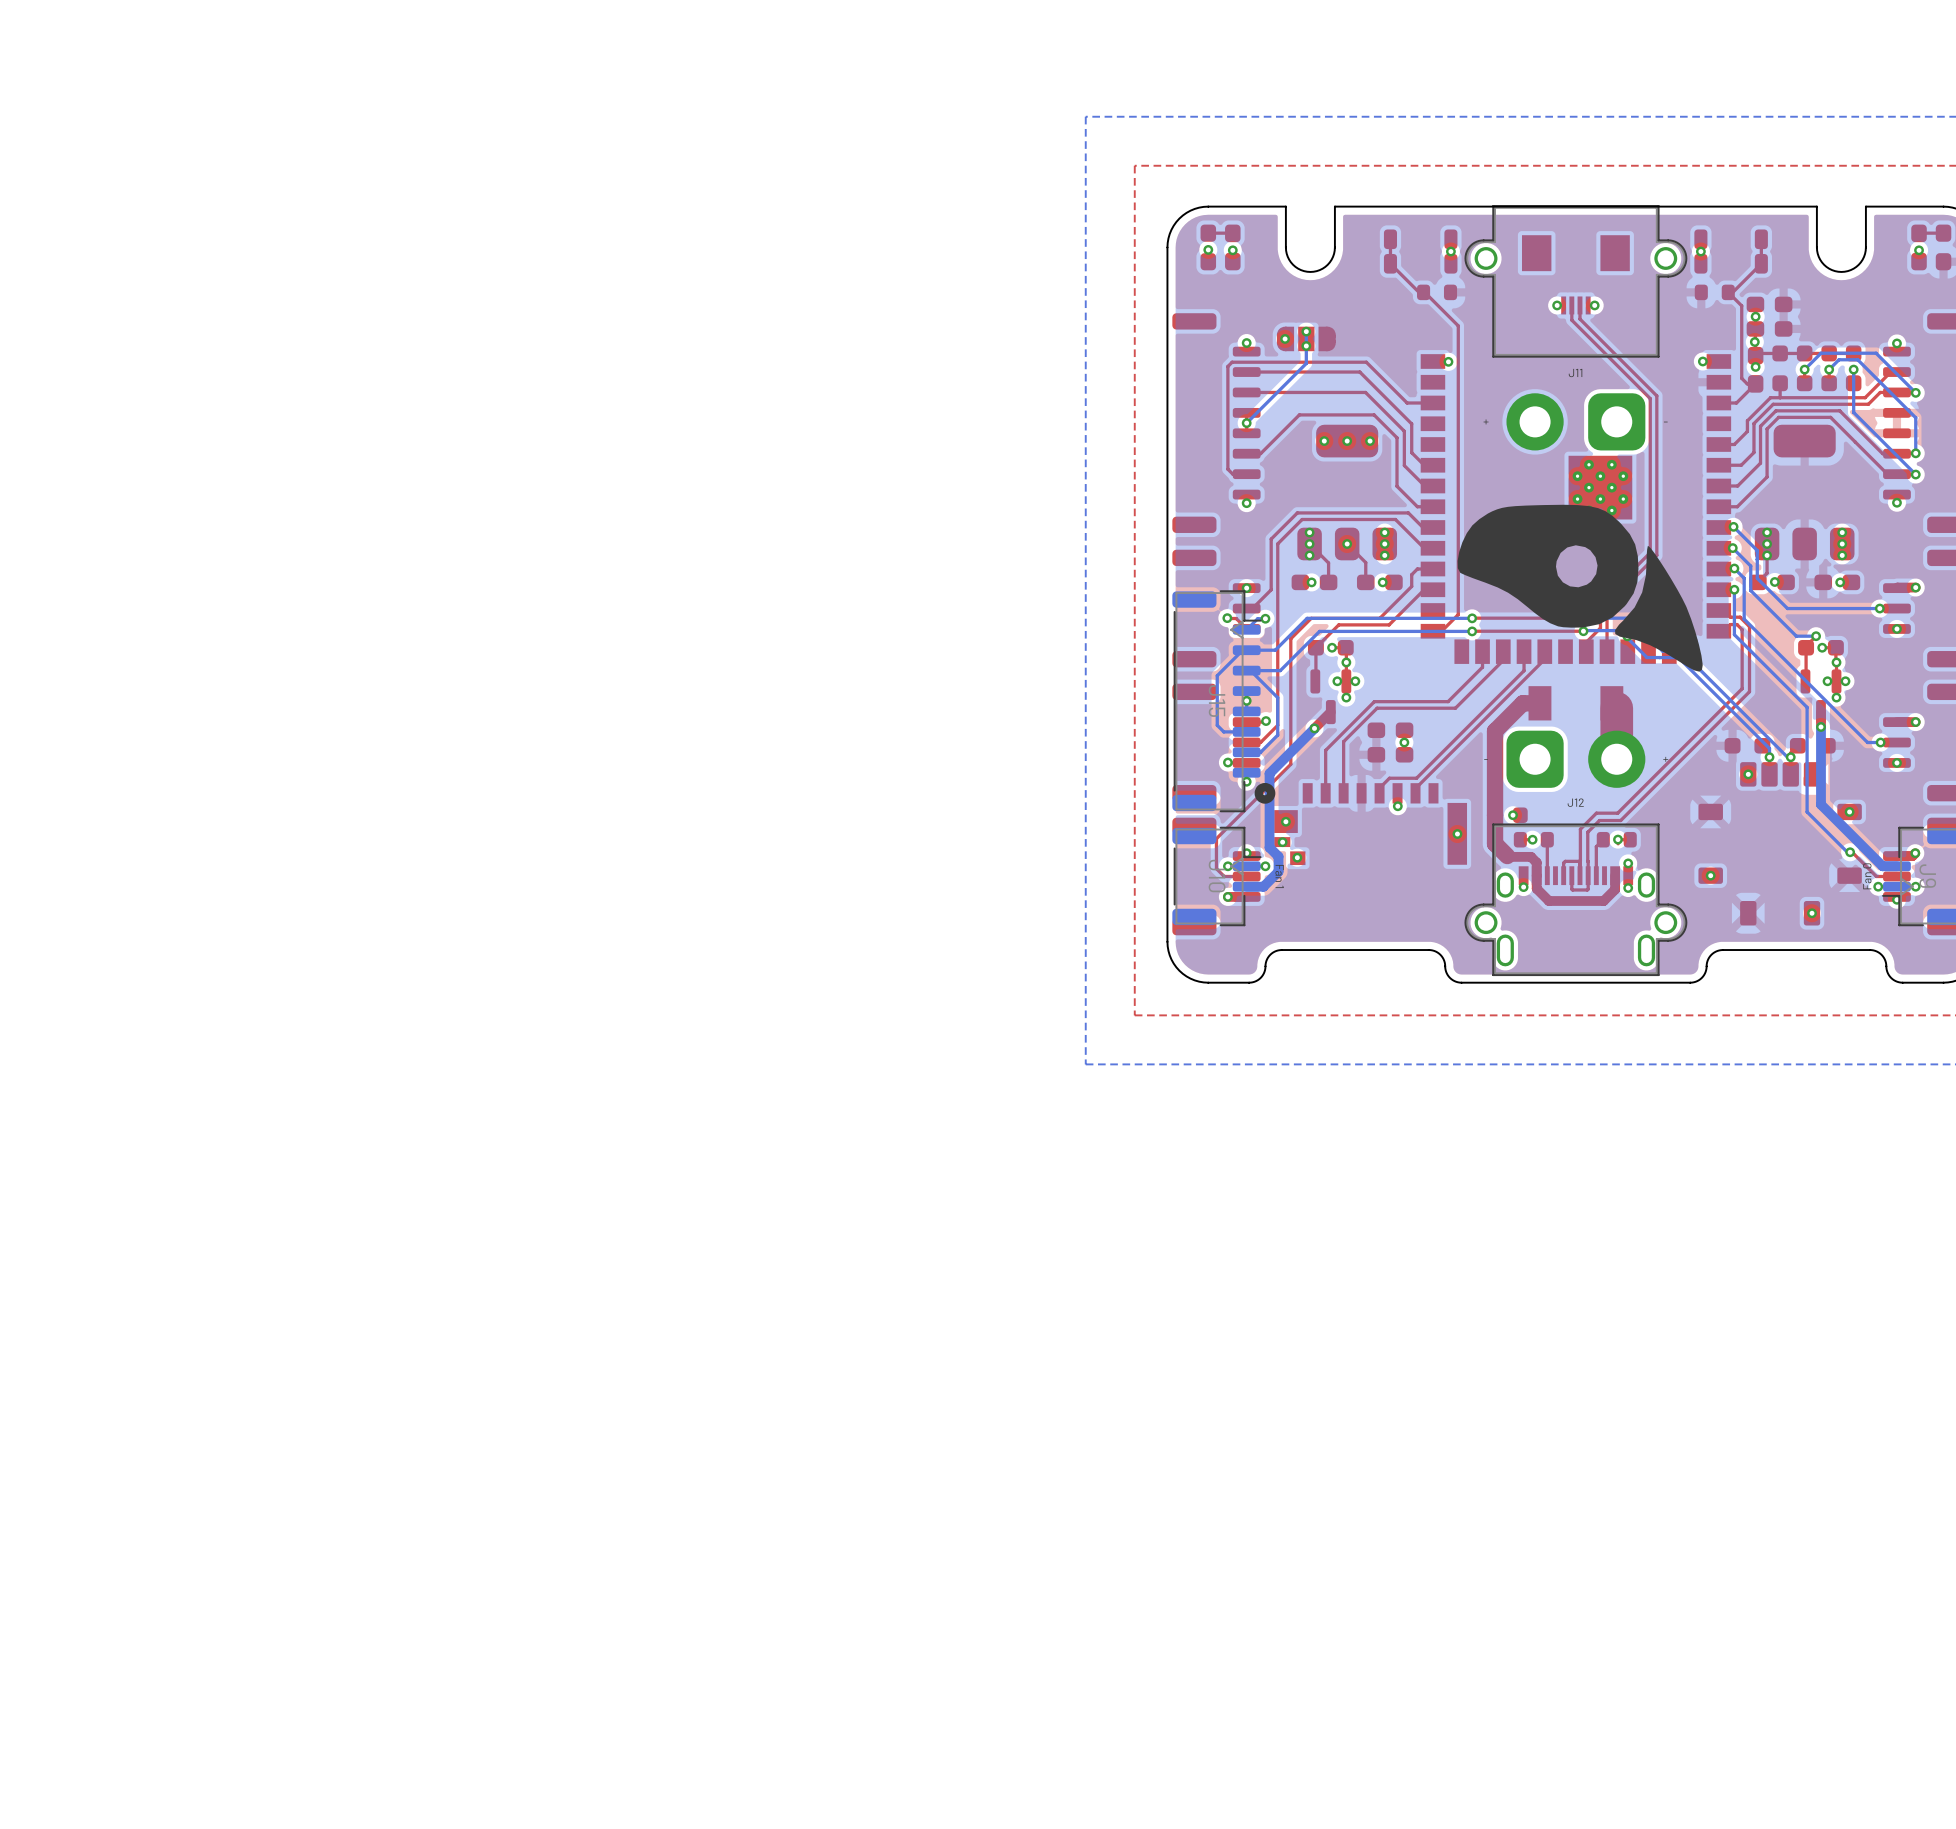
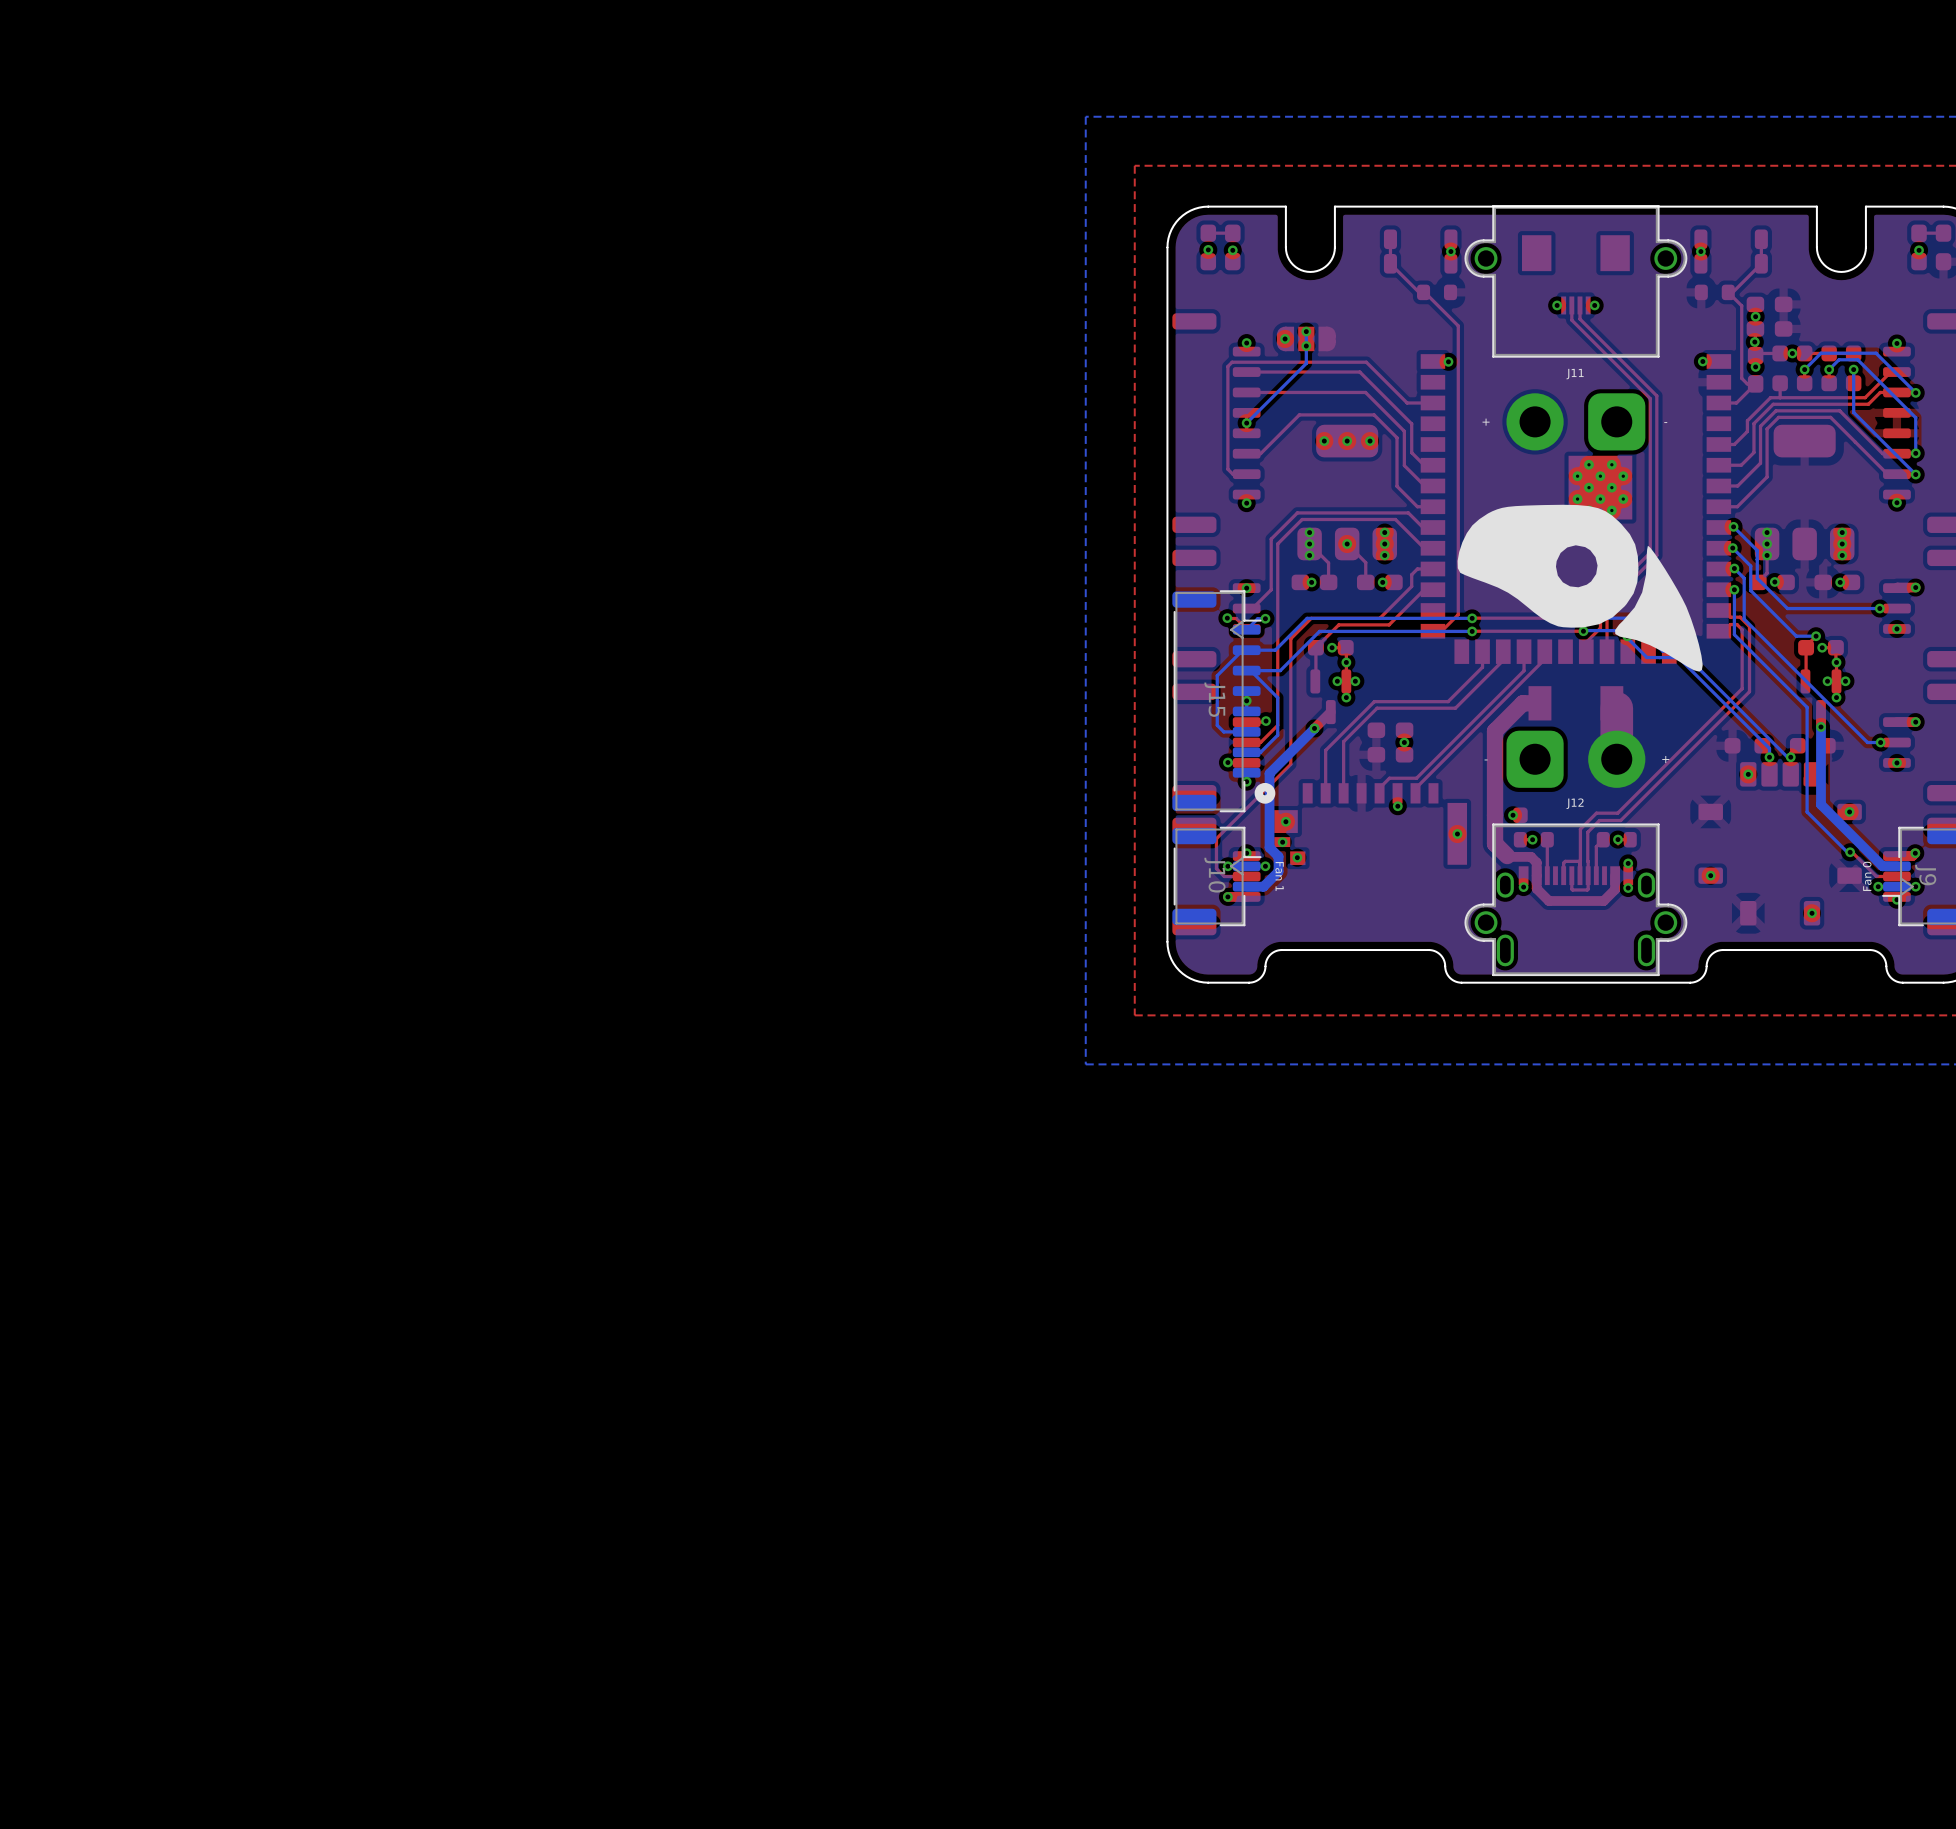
via: none -> (1792, 353)

